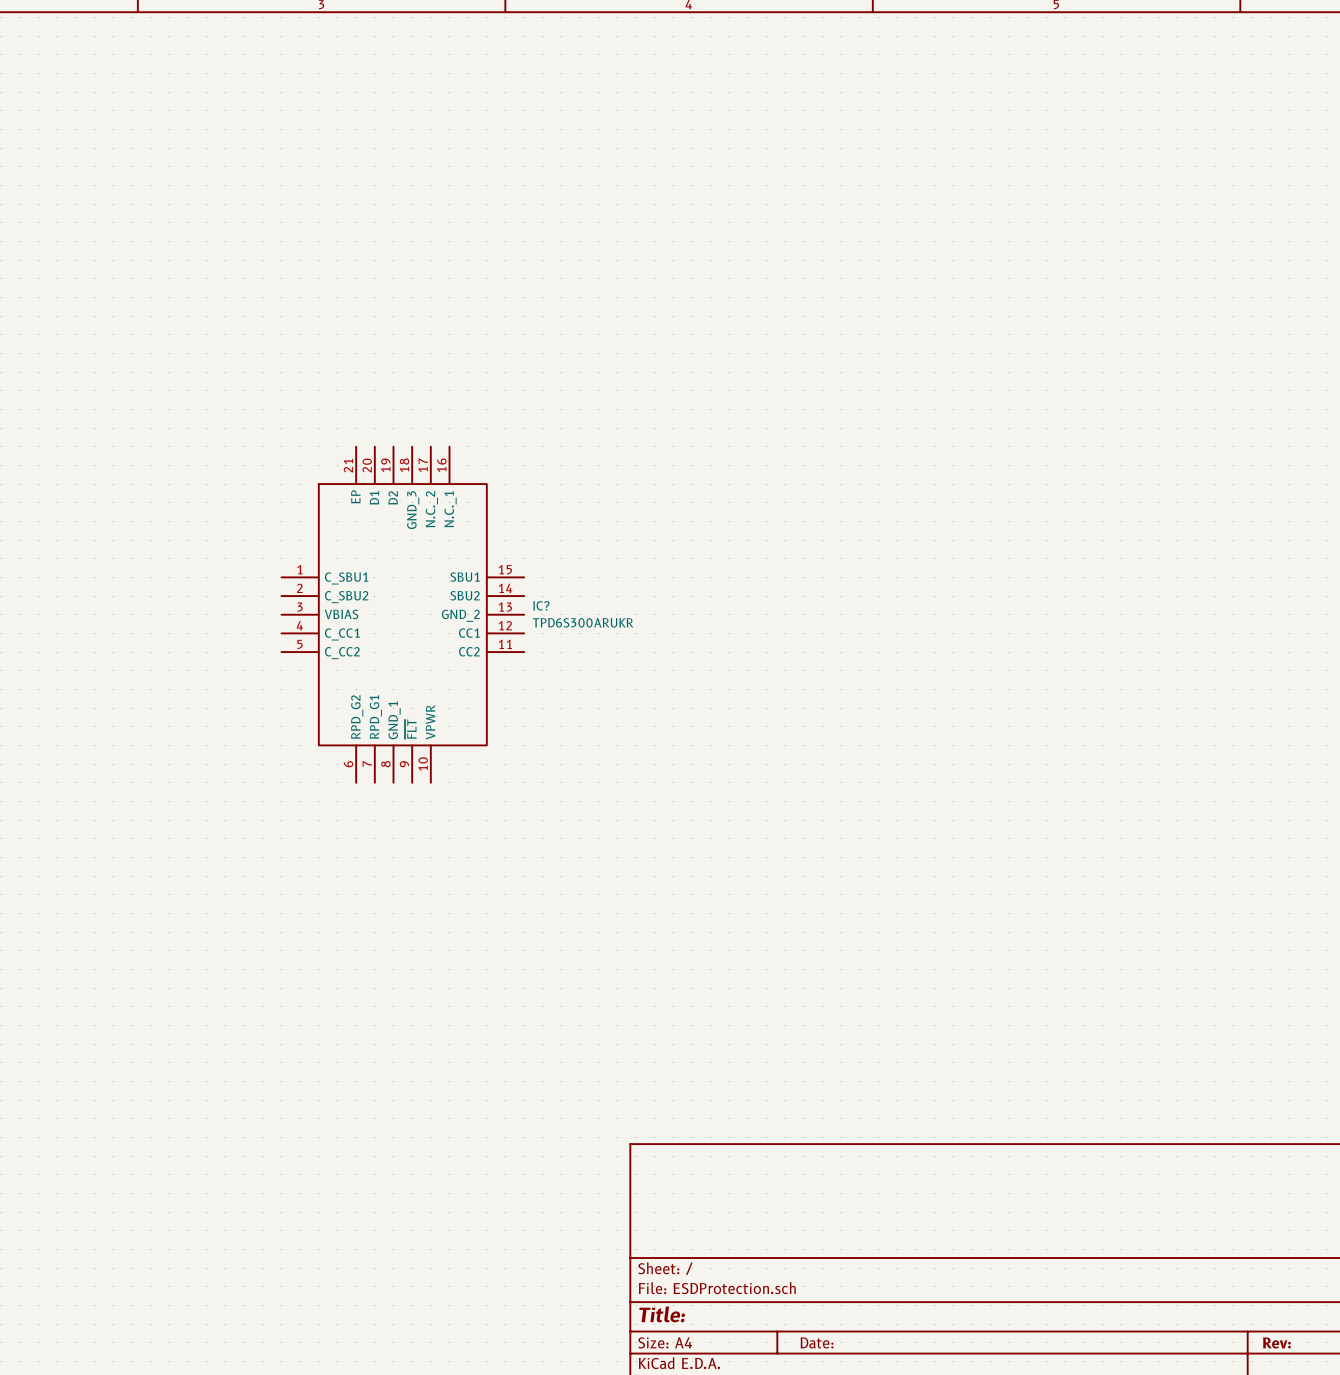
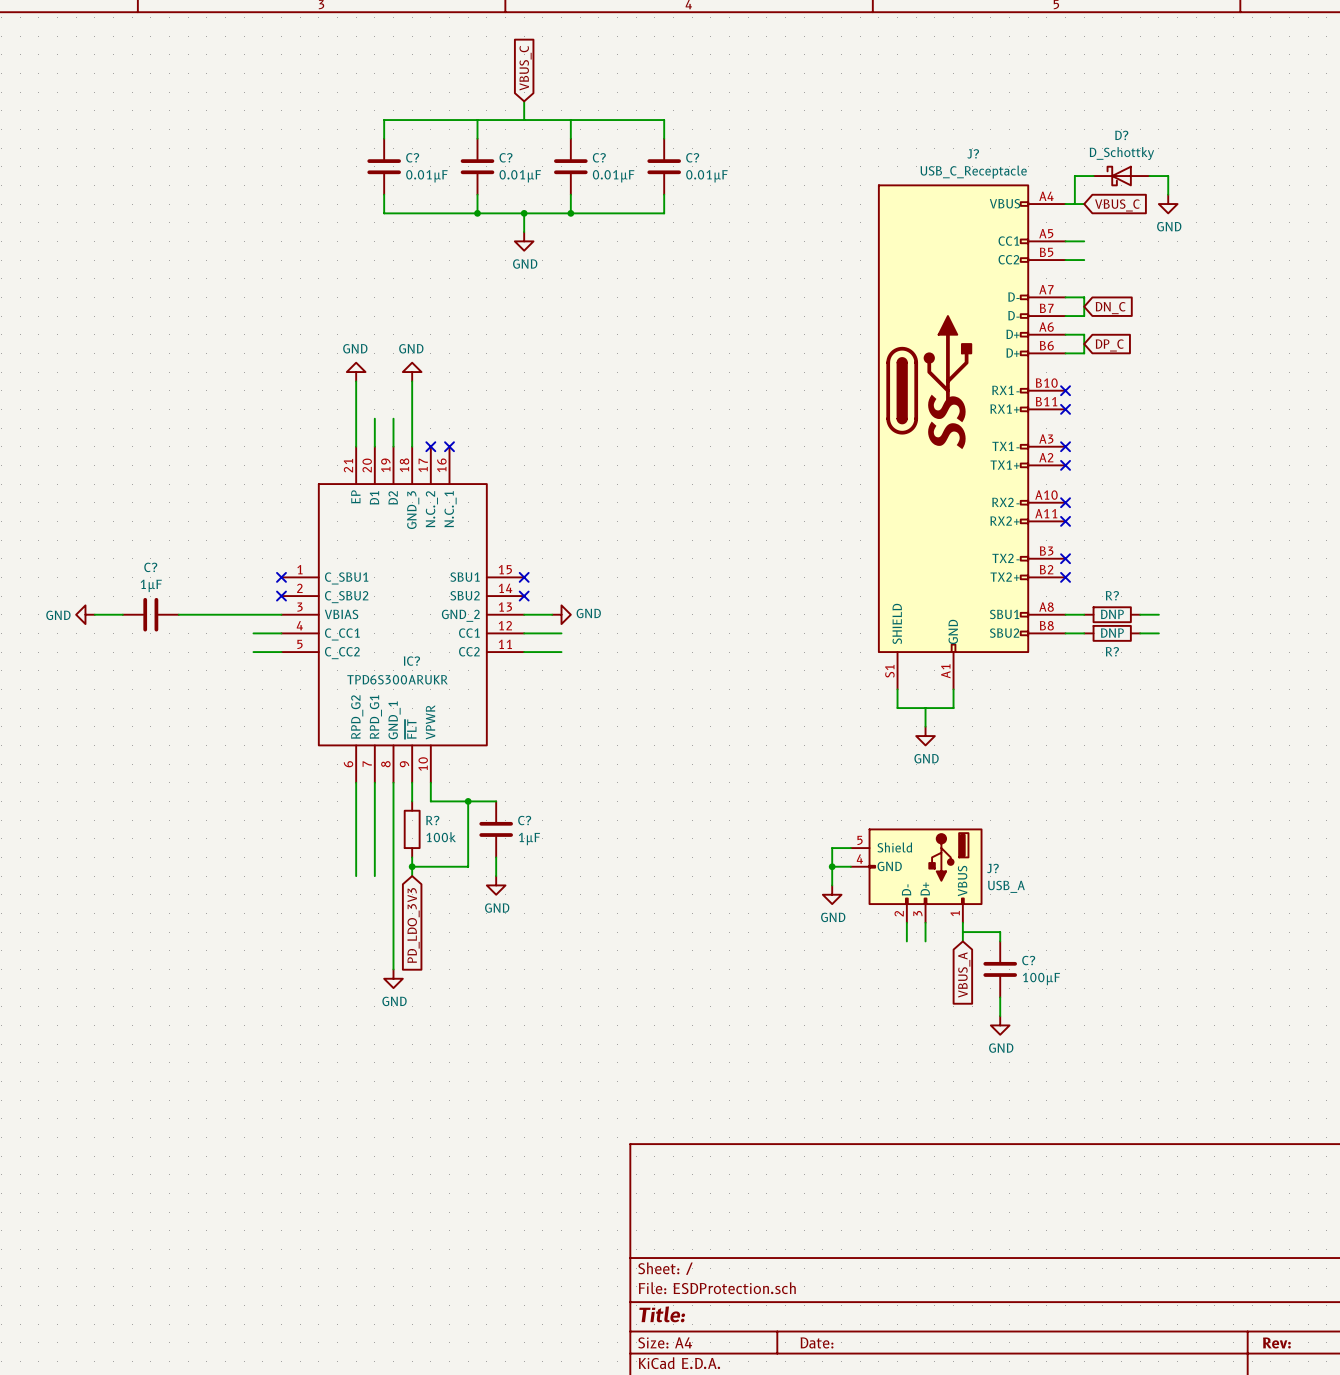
global label: none -> VBUS_C (525, 68)
wire: none -> (524, 101) (524, 120)
wire: none -> (477, 120) (477, 138)
wire: none -> (570, 120) (570, 138)
wire: none -> (384, 138) (384, 120) (664, 120) (664, 138)
C?: none -> 0.01µF (384, 166)
C?: none -> 0.01µF (477, 166)
C?: none -> 0.01µF (570, 166)
C?: none -> 0.01µF (664, 166)
wire: none -> (1093, 176) (1074, 176) (1074, 204)
D?: none -> D_Schottky (1121, 176)
wire: none -> (1149, 176) (1168, 176) (1168, 194)
wire: none -> (384, 194) (384, 213) (664, 213) (664, 194)
wire: none -> (477, 194) (477, 213)
wire: none -> (570, 194) (570, 213)
wire: none -> (1065, 204) (1084, 204)
power symbol: none -> GND (1168, 204)
global label: none -> VBUS_C (1117, 205)
junction: none -> (477, 213)
wire: none -> (524, 213) (524, 232)
junction: none -> (524, 213)
junction: none -> (570, 213)
power symbol: none -> GND (524, 241)
wire: none -> (1065, 241) (1084, 241)
wire: none -> (1065, 260) (1084, 260)
wire: none -> (1065, 297) (1084, 297) (1084, 316) (1065, 316)
global label: none -> DN_C (1110, 308)
wire: none -> (1065, 334) (1084, 334) (1084, 353) (1065, 353)
global label: none -> DP_C (1109, 345)
power symbol: none -> GND (356, 372)
power symbol: none -> GND (412, 372)
wire: none -> (356, 381) (356, 446)
wire: none -> (412, 381) (412, 446)
no-connect mark: none -> (1065, 390)
no-connect mark: none -> (1065, 409)
wire: none -> (374, 418) (374, 446)
wire: none -> (393, 418) (393, 446)
J?: none -> USB_C_Receptacle (971, 436)
no-connect mark: none -> (430, 446)
no-connect mark: none -> (449, 446)
no-connect mark: none -> (1065, 446)
no-connect mark: none -> (1065, 465)
no-connect mark: none -> (1065, 502)
no-connect mark: none -> (1065, 521)
no-connect mark: none -> (1065, 558)
no-connect mark: none -> (281, 577)
no-connect mark: none -> (524, 577)
no-connect mark: none -> (1065, 577)
no-connect mark: none -> (281, 596)
no-connect mark: none -> (524, 596)
IC? name position: IC? (541, 605) -> IC? (411, 661)
power symbol: none -> GND (85, 614)
wire: none -> (94, 614) (122, 614)
C?: none -> 1µF (150, 614)
wire: none -> (178, 614) (281, 614)
wire: none -> (524, 614) (552, 614)
power symbol: none -> GND (561, 614)
wire: none -> (1065, 614) (1084, 614)
R?: none -> DNP (1112, 614)
wire: none -> (1140, 614) (1158, 614)
IC? value position: TPD6S300ARUKR (583, 622) -> TPD6S300ARUKR (397, 679)
wire: none -> (253, 633) (281, 633)
wire: none -> (524, 633) (561, 633)
wire: none -> (1065, 633) (1084, 633)
R?: none -> DNP (1112, 633)
wire: none -> (1140, 633) (1158, 633)
wire: none -> (253, 652) (281, 652)
wire: none -> (524, 652) (561, 652)
wire: none -> (897, 689) (897, 708) (953, 708) (953, 689)
wire: none -> (925, 708) (925, 726)
power symbol: none -> GND (925, 736)
wire: none -> (356, 782) (356, 876)
wire: none -> (374, 782) (374, 876)
wire: none -> (393, 782) (393, 969)
wire: none -> (412, 782) (412, 801)
wire: none -> (430, 782) (430, 801) (496, 801)
wire: none -> (468, 801) (468, 866) (412, 866)
junction: none -> (468, 801)
R?: none -> 100k (412, 829)
C?: none -> 1µF (496, 829)
wire: none -> (850, 848) (832, 848) (832, 885)
wire: none -> (412, 857) (412, 876)
wire: none -> (496, 857) (496, 876)
junction: none -> (412, 866)
wire: none -> (832, 866) (850, 866)
junction: none -> (832, 866)
J?: none -> USB_A (916, 875)
power symbol: none -> GND (496, 885)
power symbol: none -> GND (832, 894)
wire: none -> (906, 922) (906, 941)
wire: none -> (925, 922) (925, 941)
wire: none -> (962, 922) (962, 941)
global label: none -> PD_LDO_3V3 (413, 925)
wire: none -> (962, 932) (1000, 932) (1000, 941)
C?: none -> 100µF (1000, 969)
global label: none -> VBUS_A (964, 974)
power symbol: none -> GND (393, 978)
wire: none -> (1000, 997) (1000, 1016)
power symbol: none -> GND (1000, 1025)

